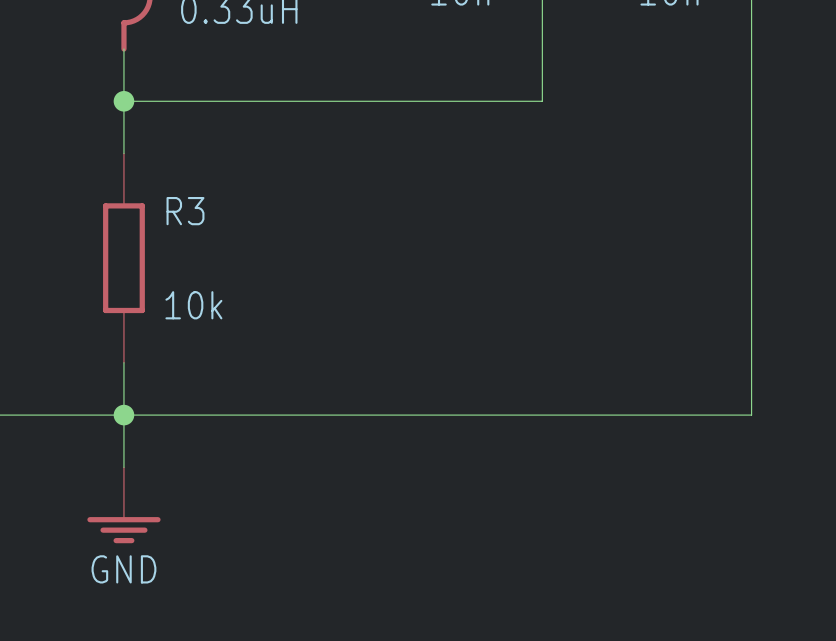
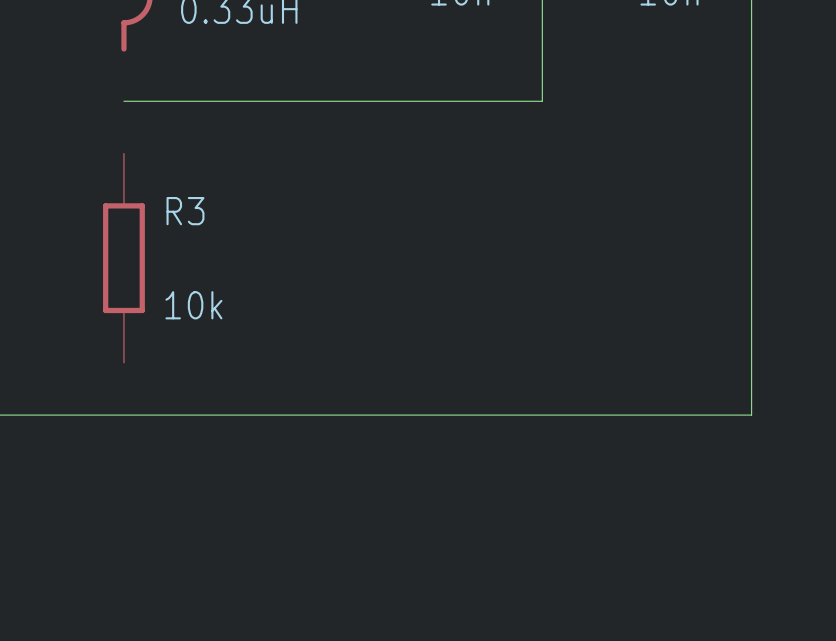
wire: (123, 48) (123, 153) -> none
junction: (123, 101) -> none
wire: (123, 362) (123, 467) -> none
junction: (123, 415) -> none
power symbol: GND (123, 505) -> none

